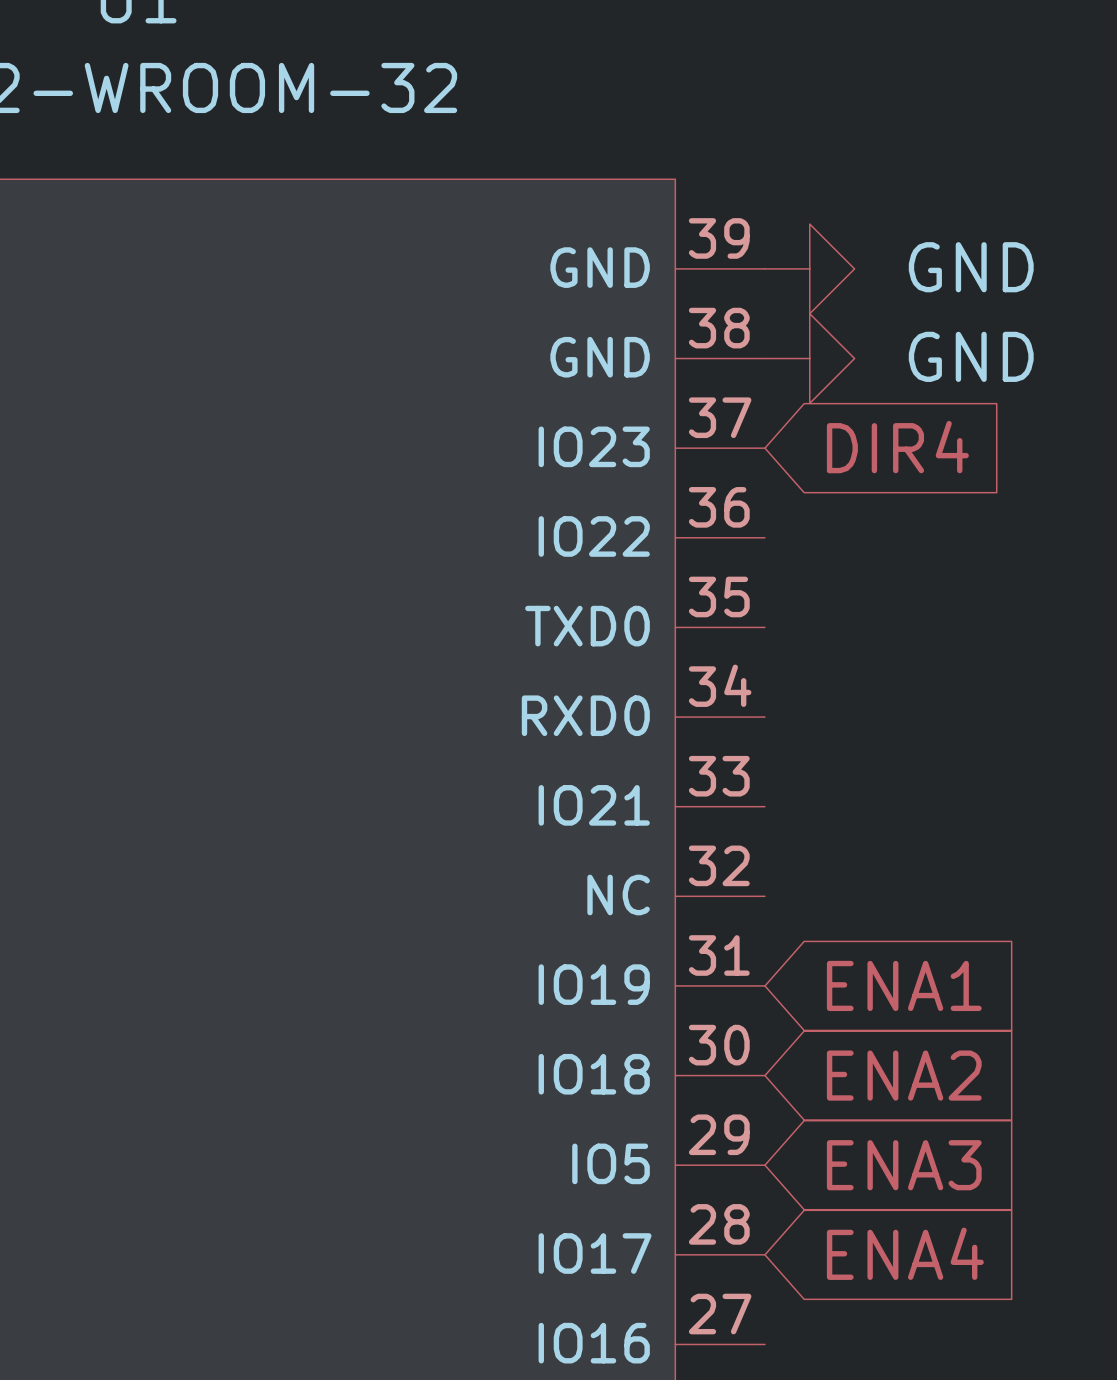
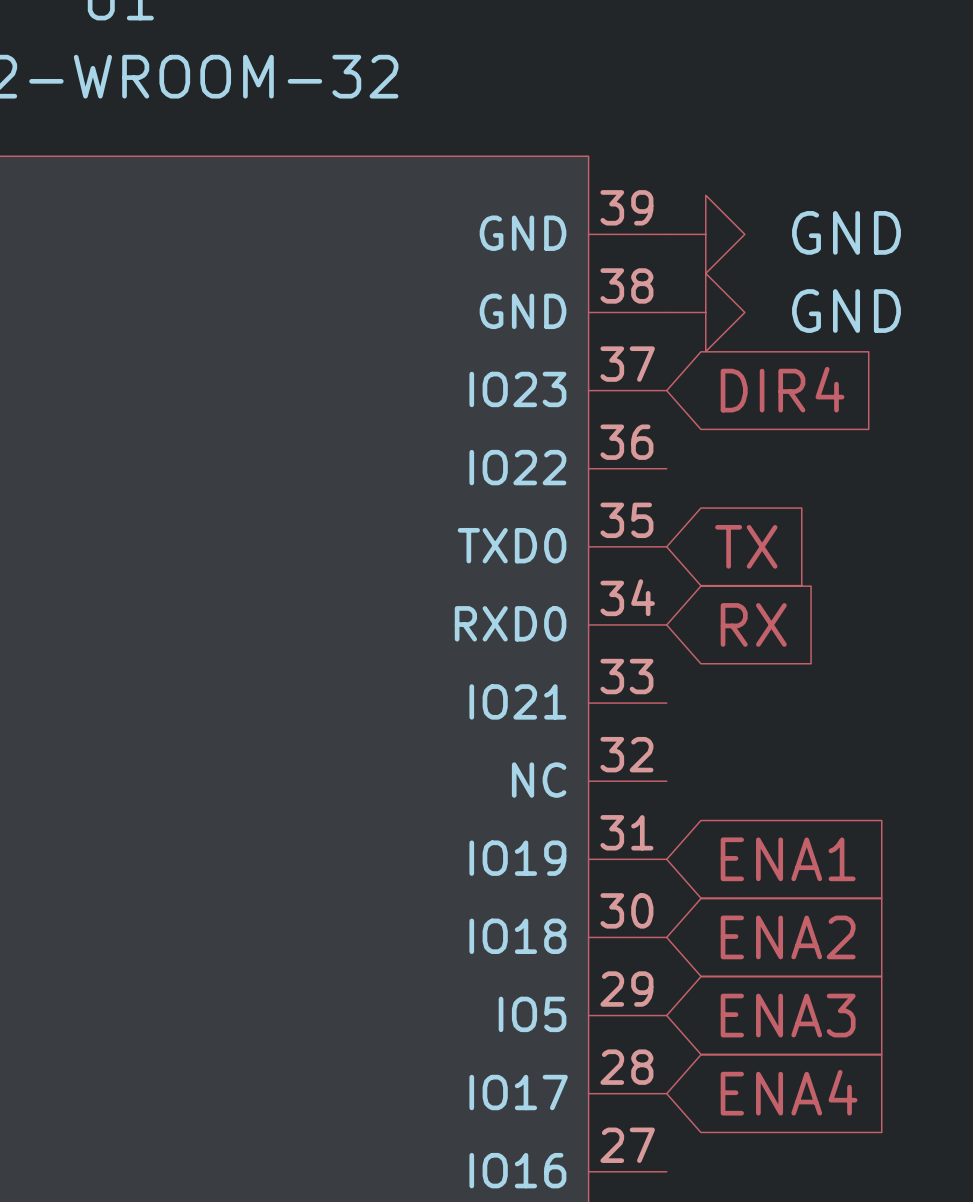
global label: none -> TX (746, 546)
global label: none -> RX (753, 624)

